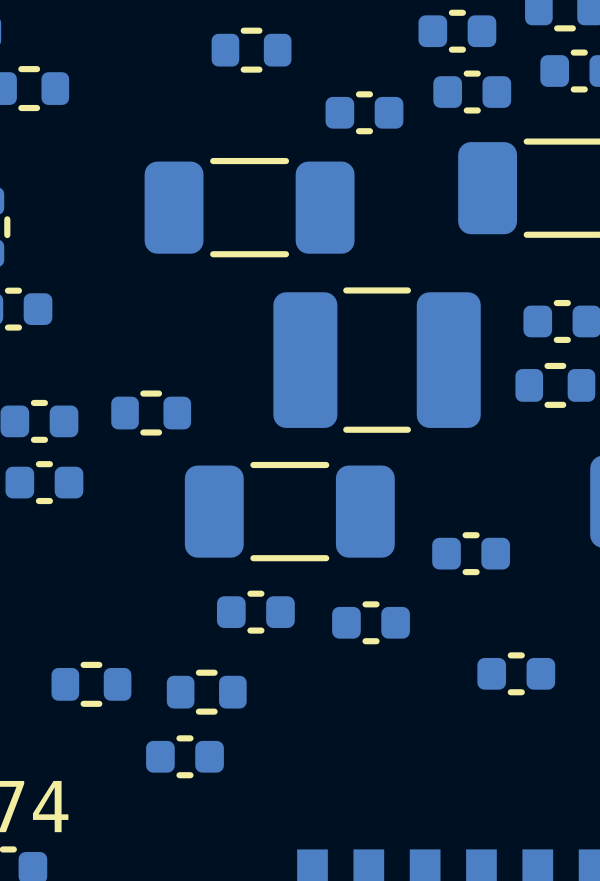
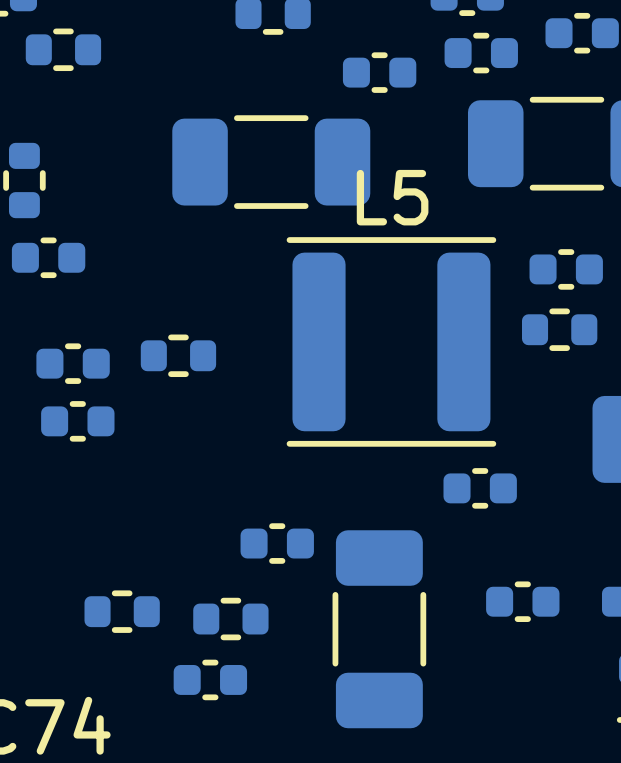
part: (377, 360) -> none
L5: none -> (391, 341)
part rotation: 0° (289, 511) -> 90° clockwise (379, 629)
part position: (289, 511) -> (379, 629)
part: (371, 622) -> none

